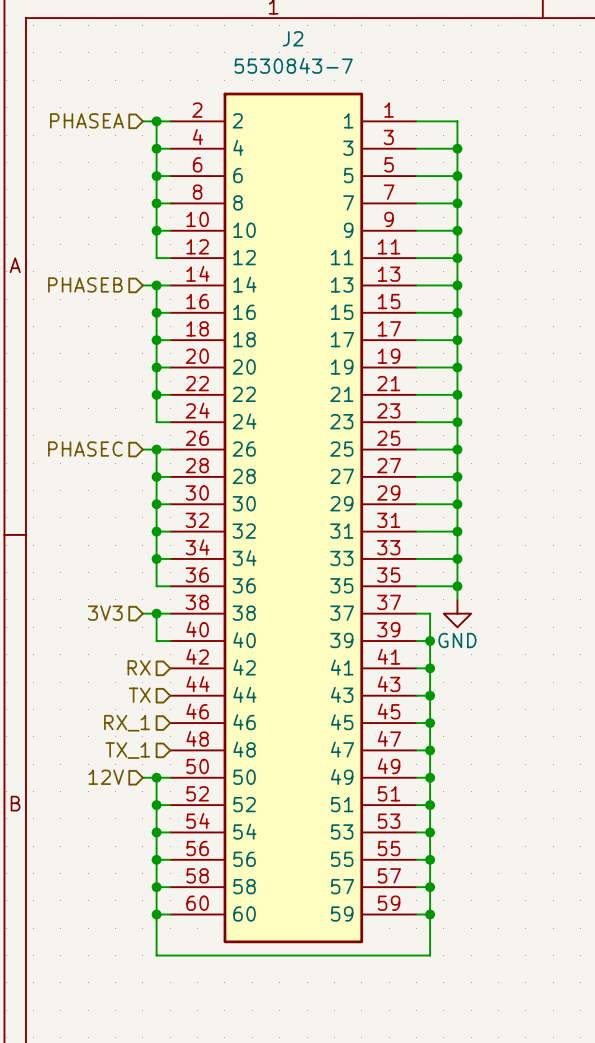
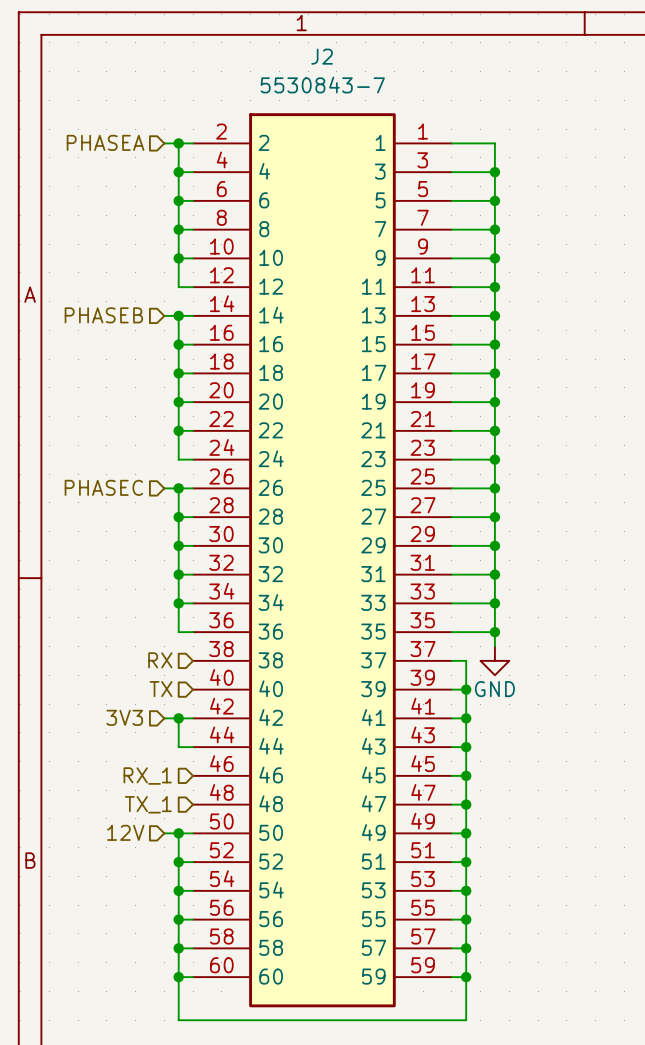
hierarchical label position: 3V3 (105, 613) -> 3V3 (124, 717)
wire: (142, 613) (170, 613) -> (164, 718) (193, 718)
wire: (156, 613) (156, 641) (170, 641) -> (178, 718) (178, 747) (193, 747)
junction position: (156, 613) -> (178, 718)
hierarchical label position: RX (139, 667) -> RX (160, 660)
hierarchical label position: TX (139, 695) -> TX (161, 689)

